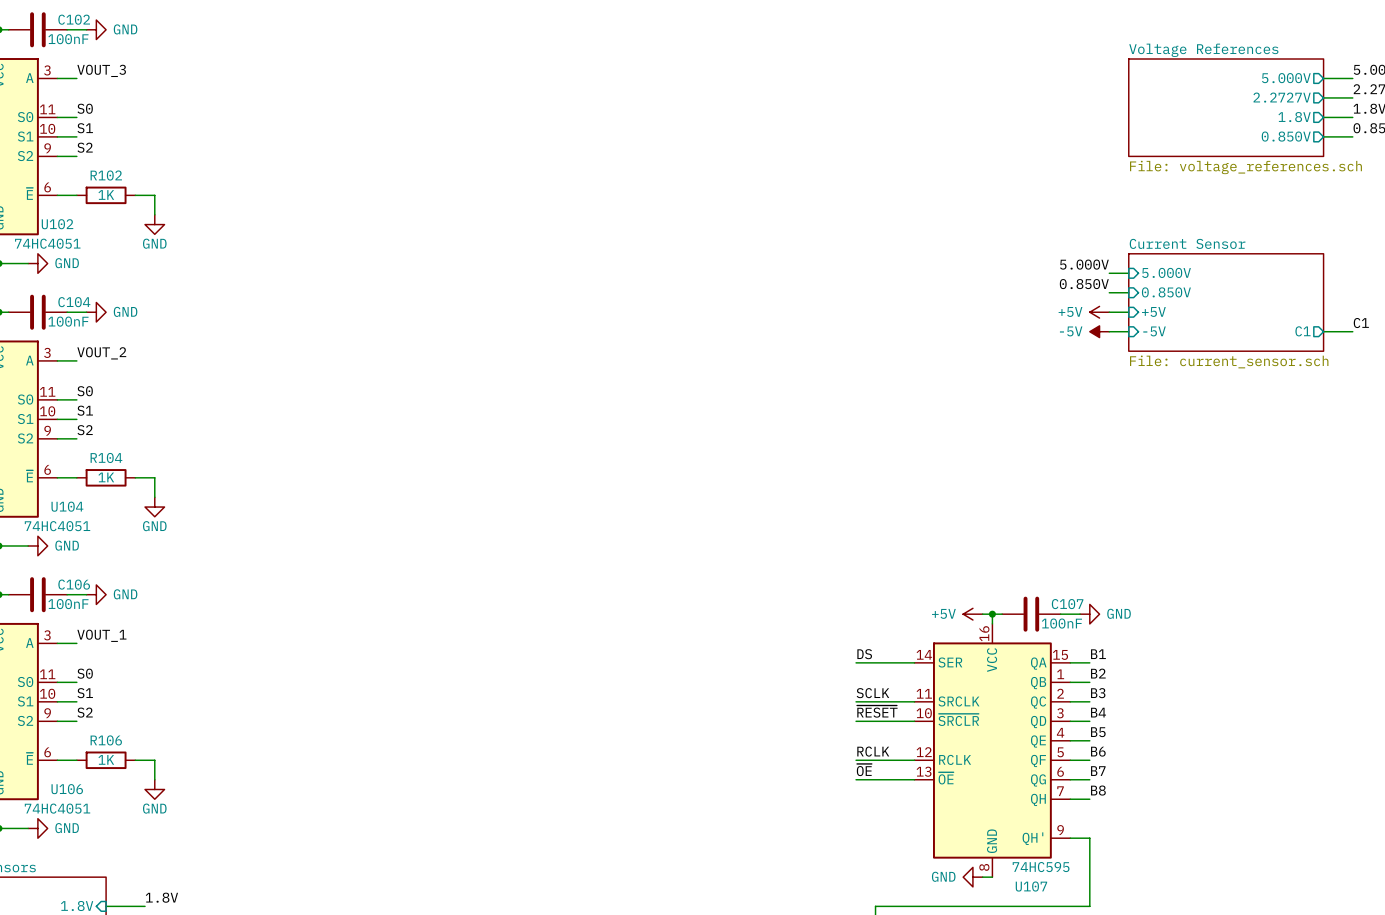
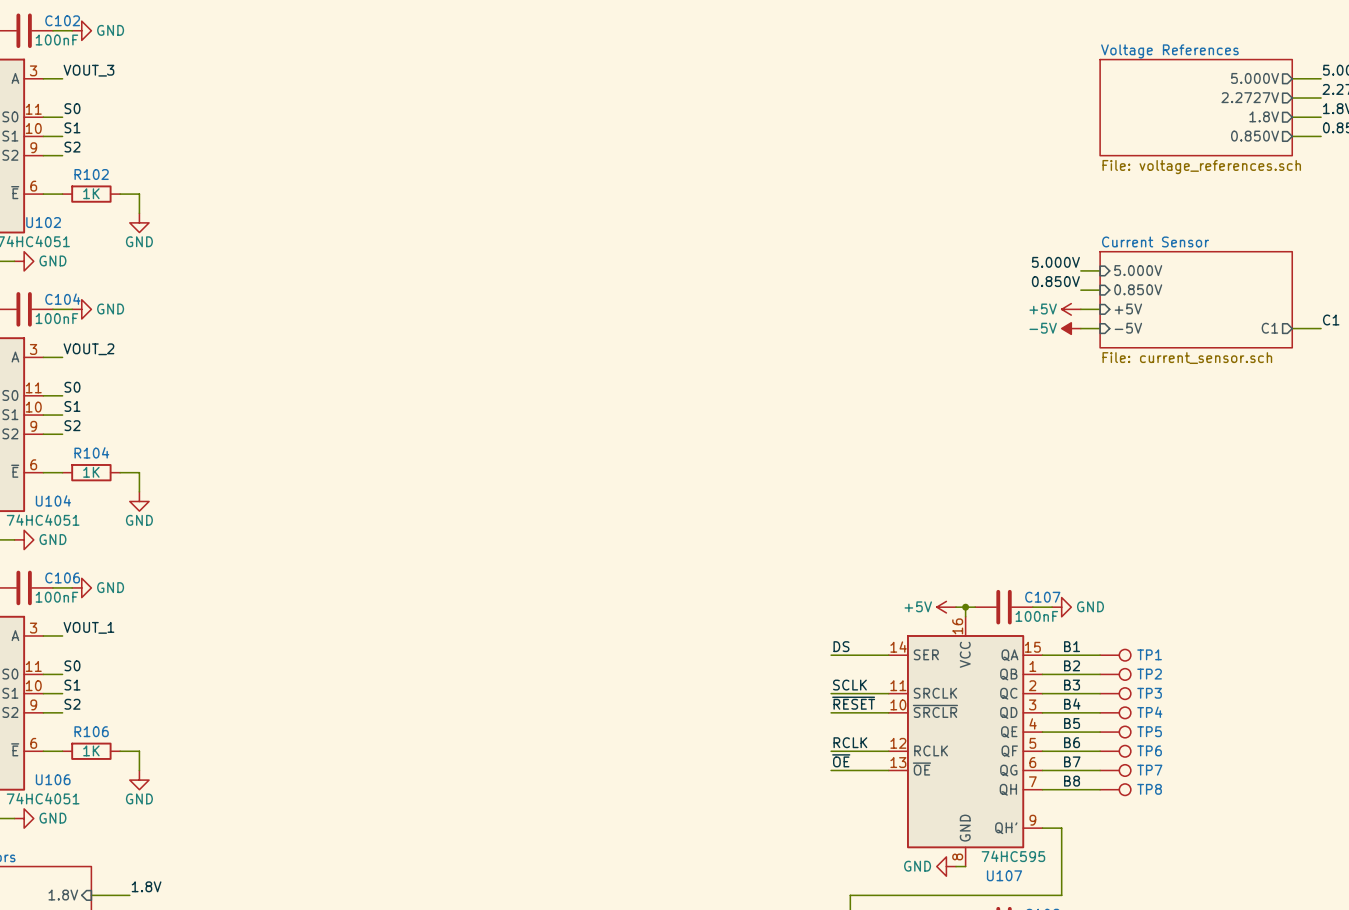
wire: none -> (1061, 655) (1100, 655)
TP1: none -> (1115, 655)
wire: none -> (1061, 674) (1100, 674)
TP2: none -> (1115, 674)
wire: none -> (1061, 693) (1100, 693)
TP3: none -> (1115, 693)
wire: none -> (1061, 712) (1100, 712)
TP4: none -> (1115, 712)
wire: none -> (1061, 732) (1100, 732)
TP5: none -> (1115, 732)
wire: none -> (1061, 751) (1100, 751)
TP6: none -> (1115, 751)
wire: none -> (1061, 770) (1100, 770)
TP7: none -> (1115, 770)
wire: none -> (1061, 789) (1100, 789)
TP8: none -> (1115, 789)

